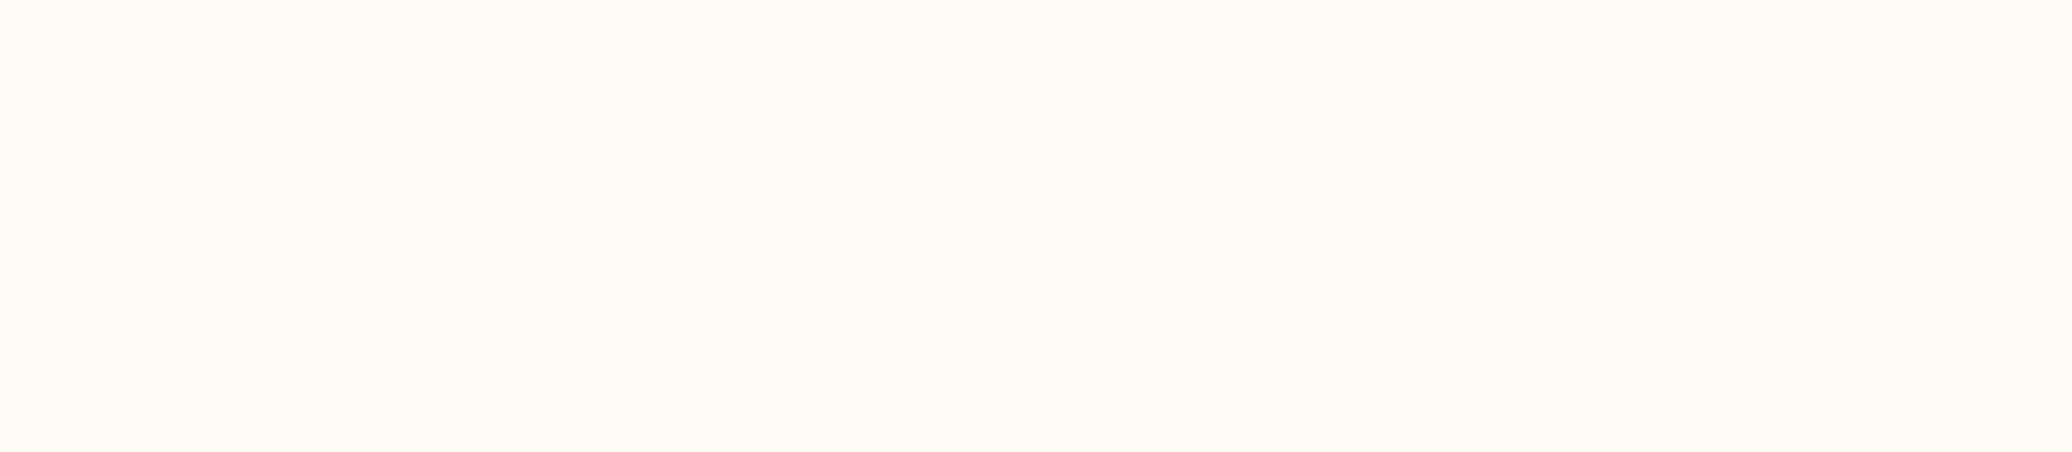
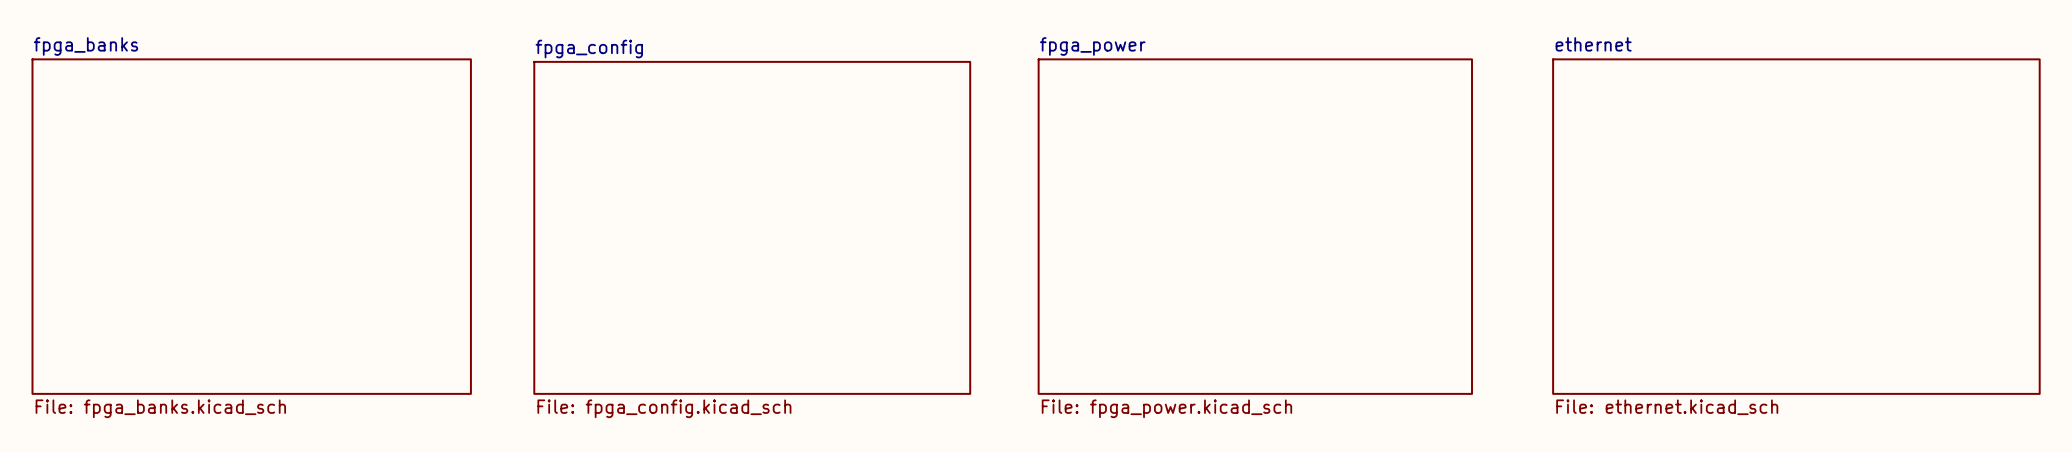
sheet fpga_banks: none -> File: fpga_banks.kicad_sch (251, 226)
sheet fpga_power: none -> File: fpga_power.kicad_sch (1255, 226)
sheet ethernet: none -> File: ethernet.kicad_sch (1796, 226)
sheet fpga_config: none -> File: fpga_config.kicad_sch (752, 227)

